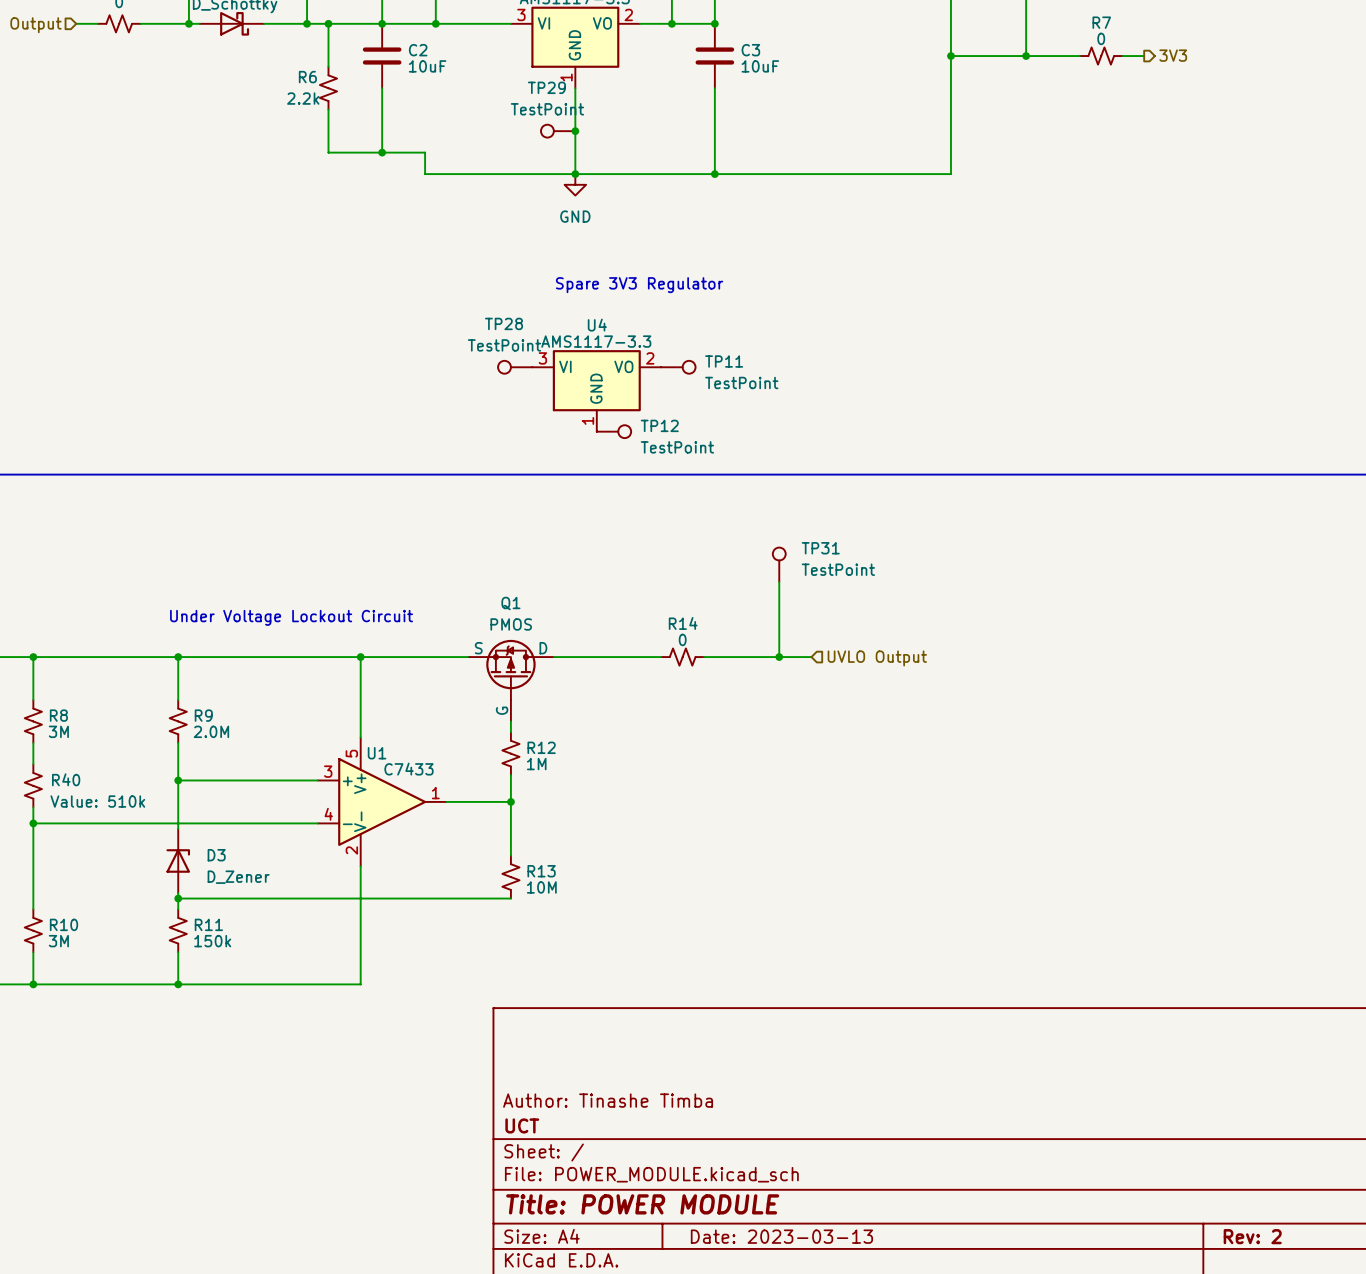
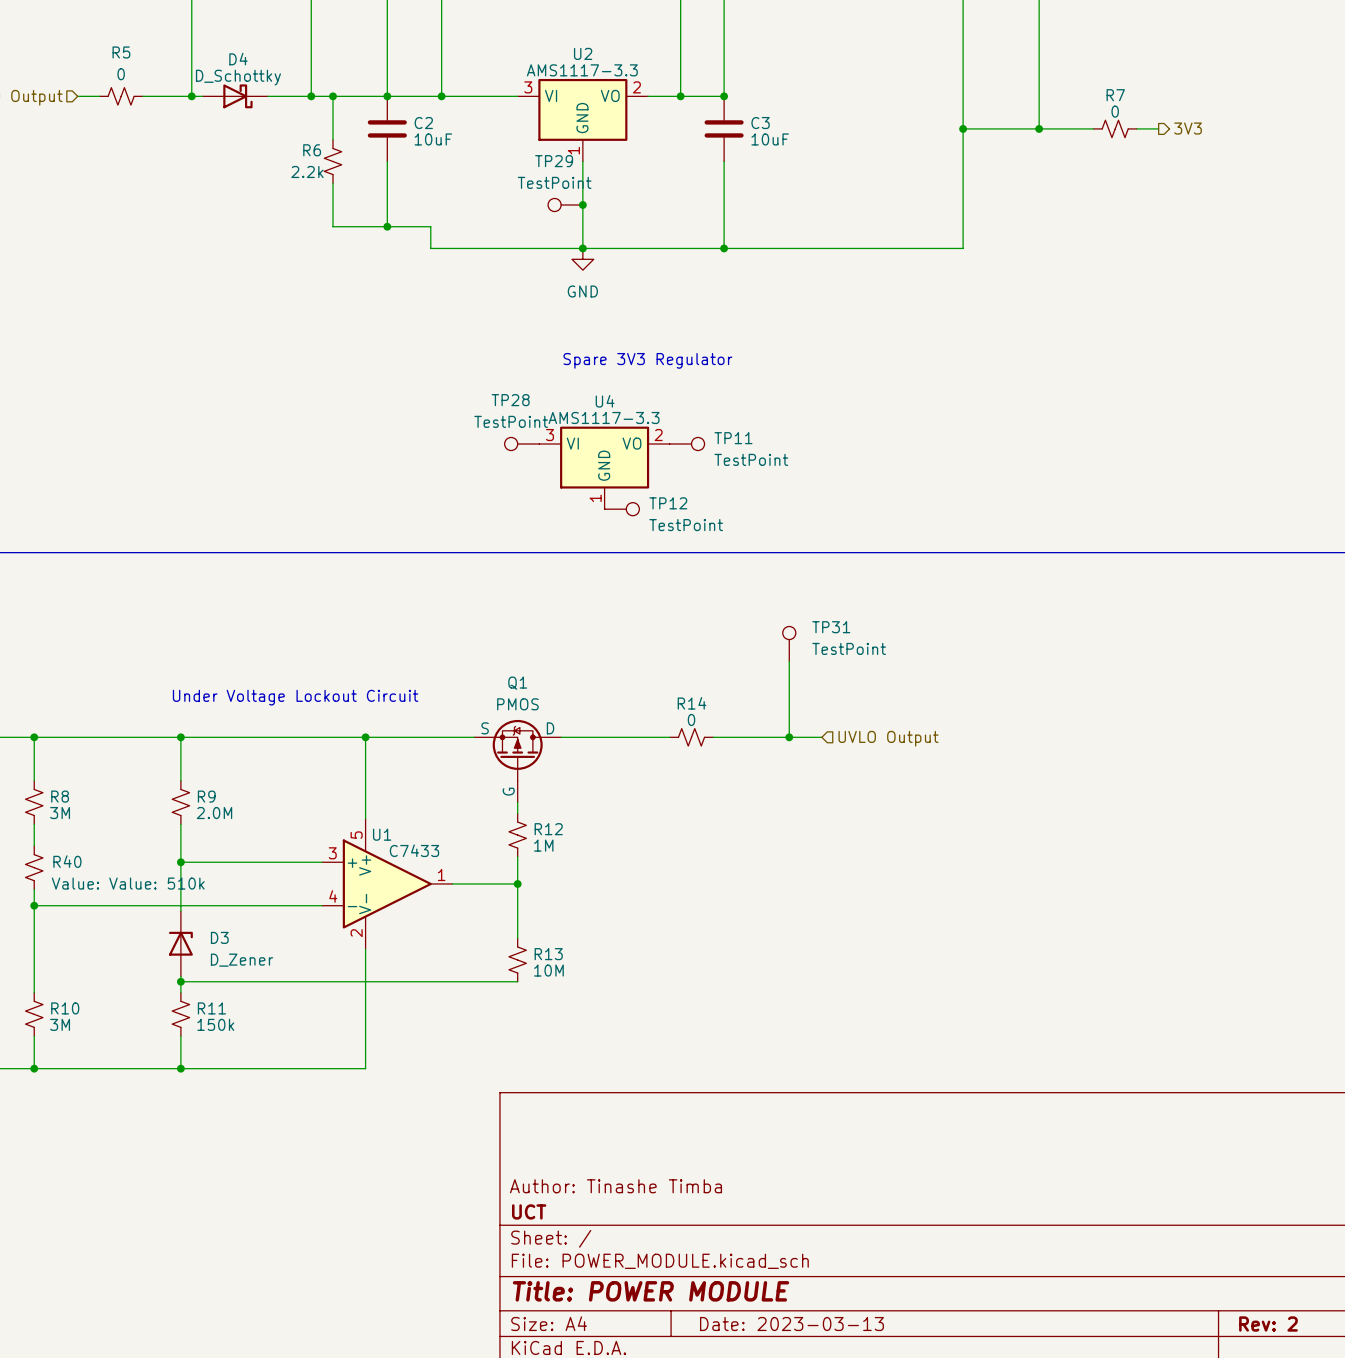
R40 value: Value: 510k (97, 801) -> Value: Value: 510k (128, 883)

